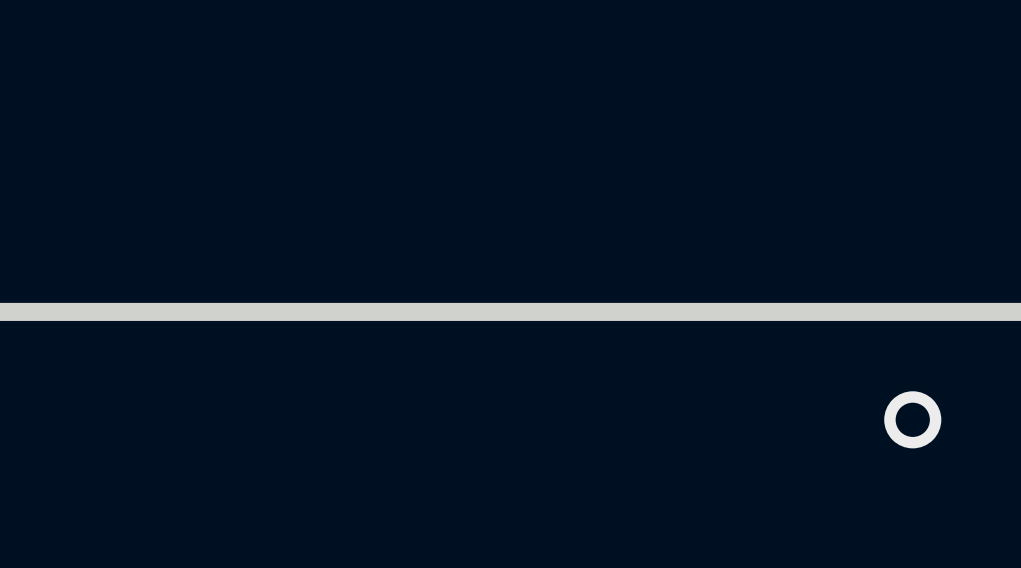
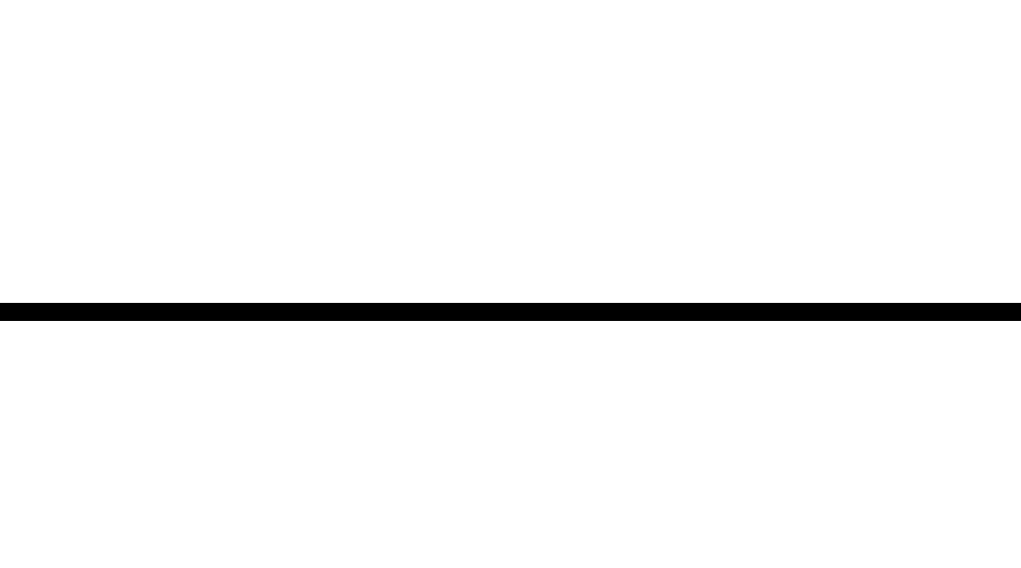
via: (912, 419) -> none

